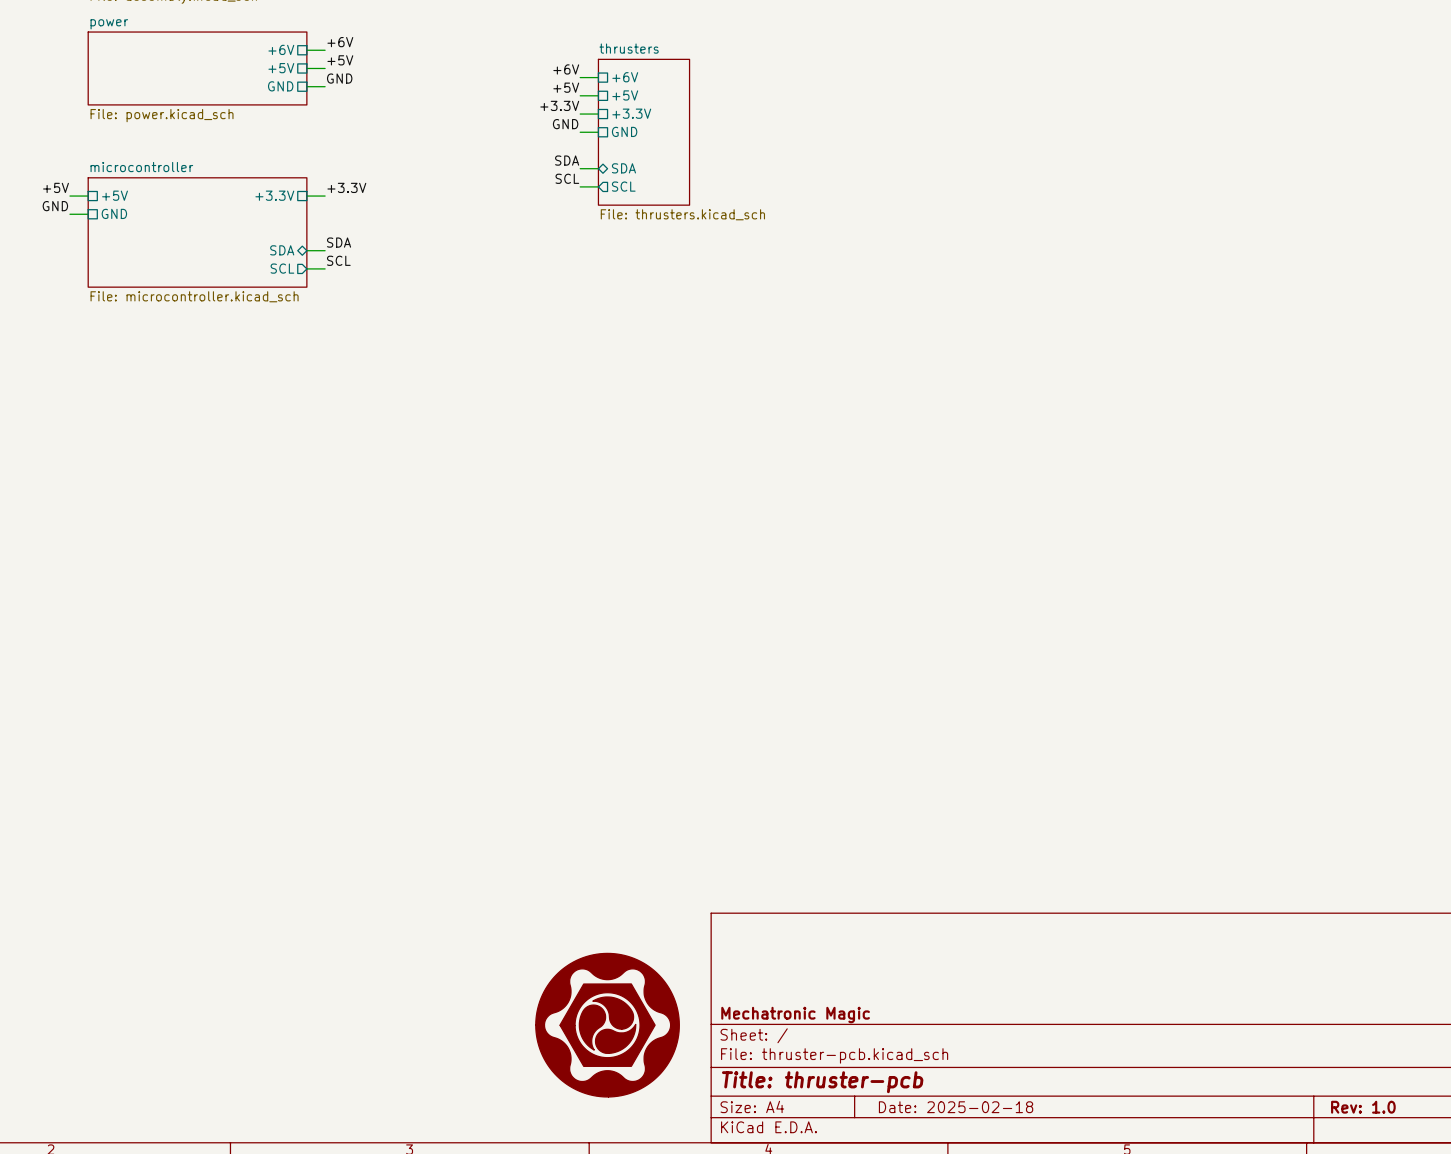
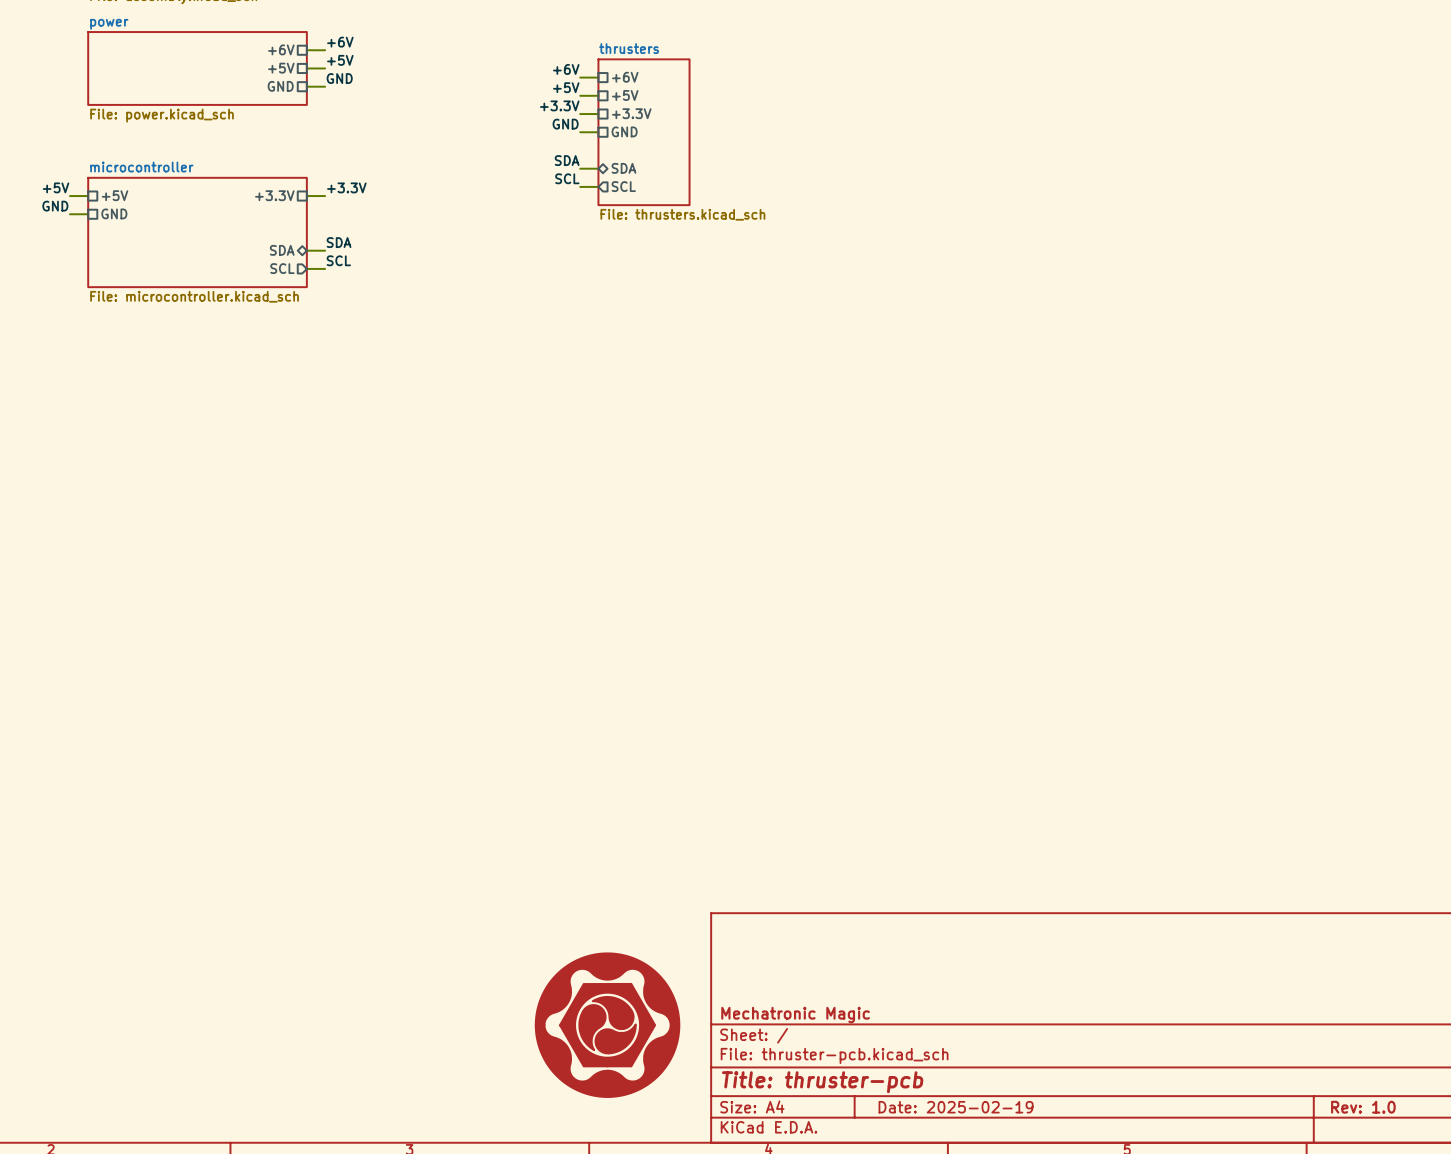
title block: Date: 2025-02-18 (956, 1107) -> Date: 2025-02-19 (956, 1107)

